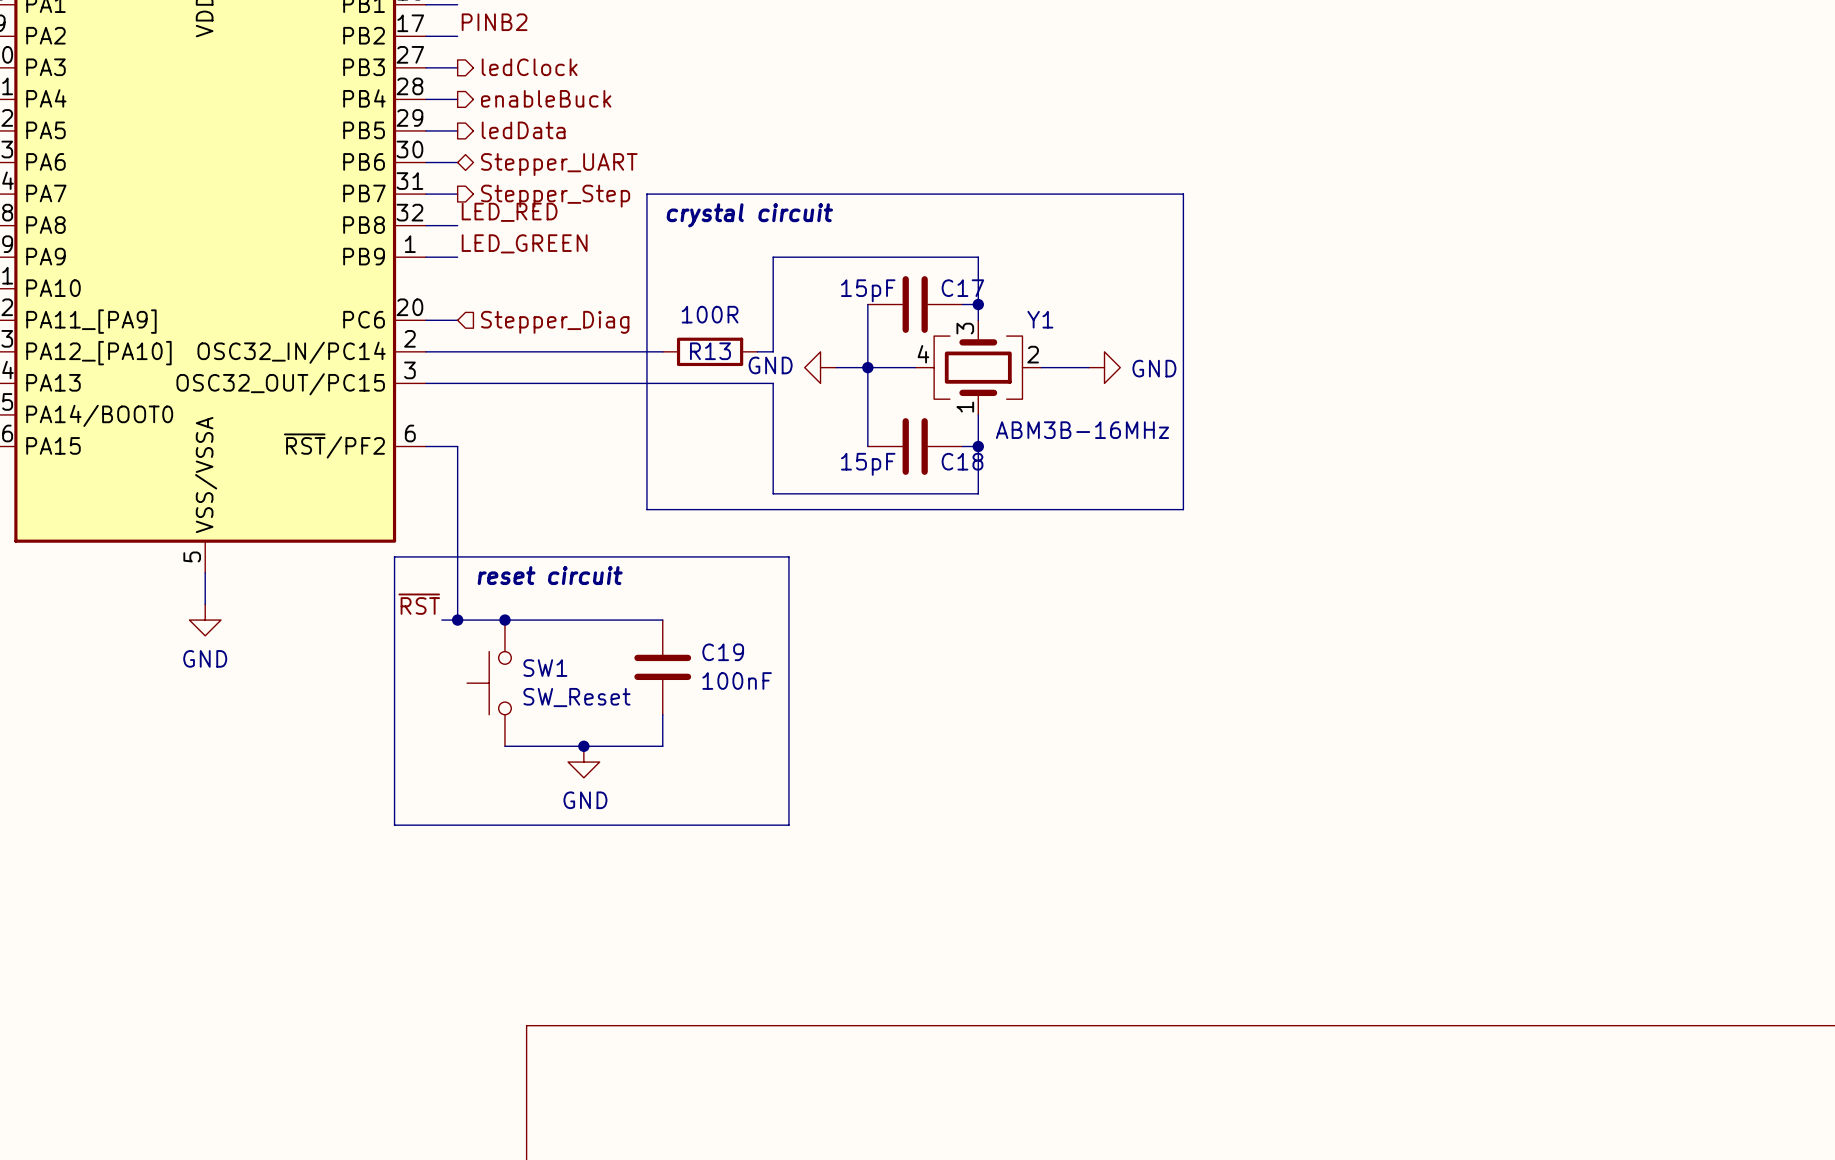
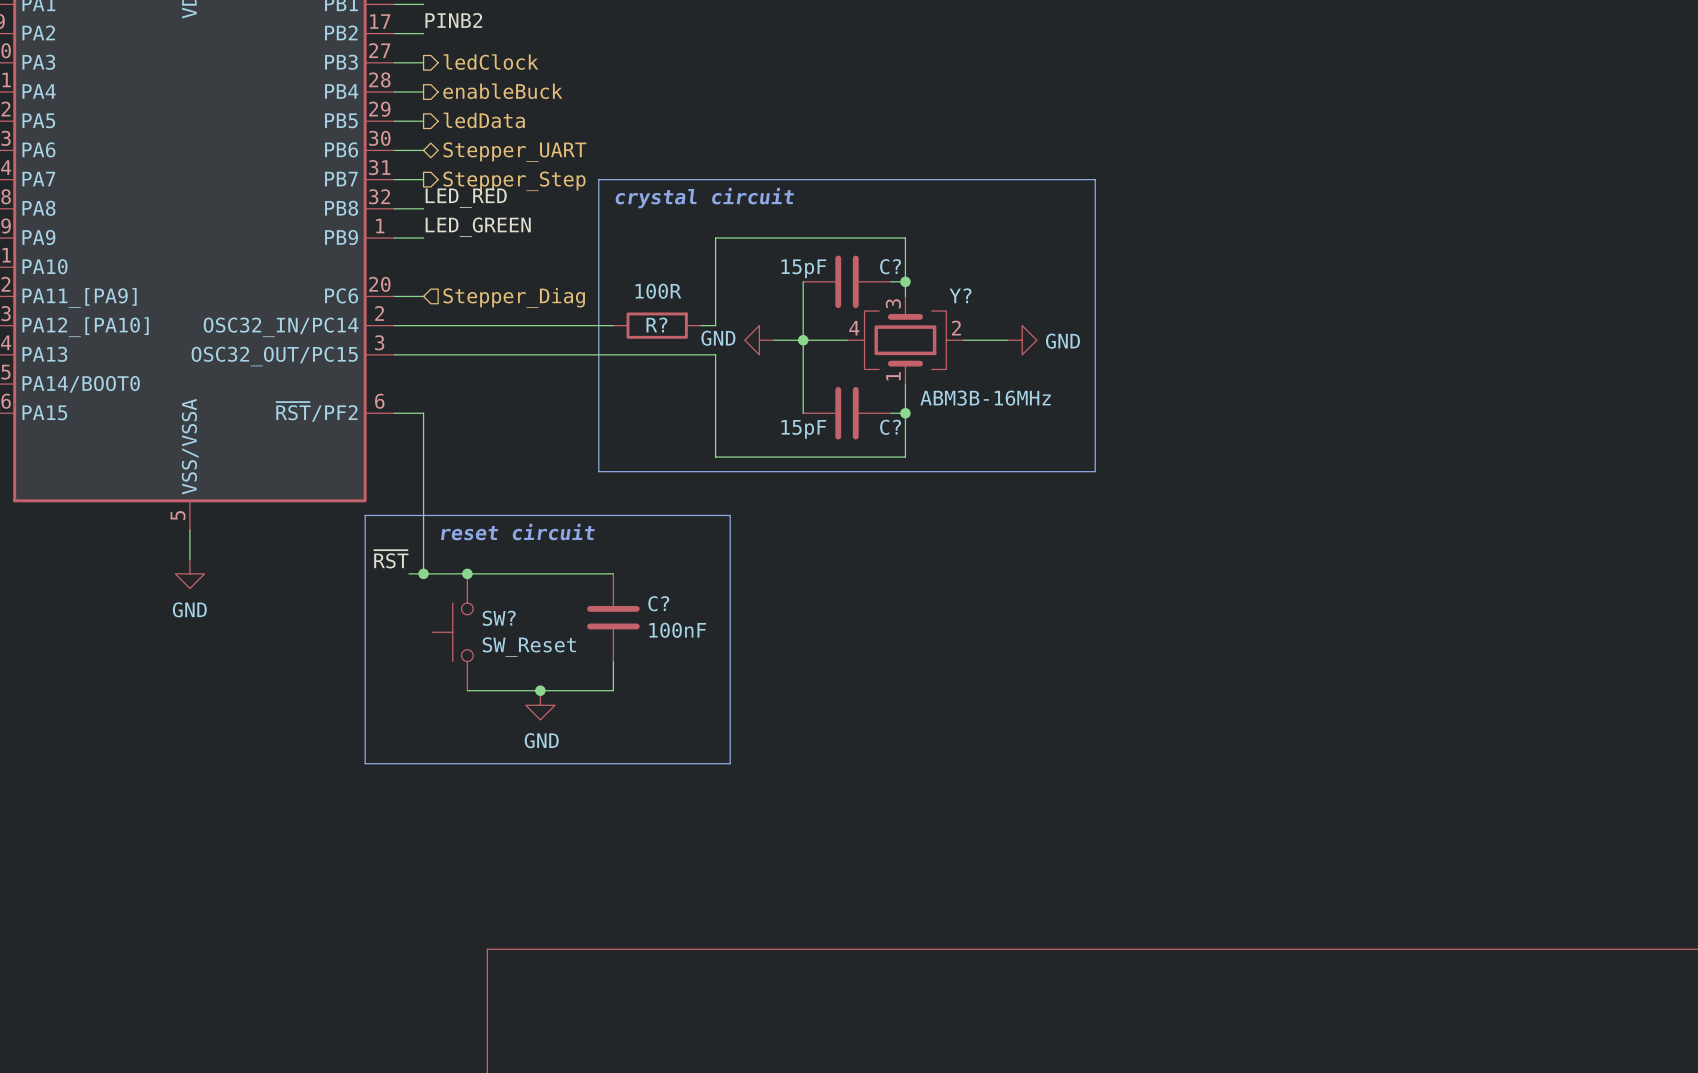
C17 name: C17 (962, 288) -> C? (890, 266)
Y1 name: Y1 (1040, 319) -> Y? (960, 295)
R13 name: R13 (710, 351) -> R? (656, 324)
C18 name: C18 (962, 461) -> C? (890, 427)
C19 name: C19 (723, 652) -> C? (658, 603)
SW1 name: SW1 (545, 668) -> SW? (499, 618)

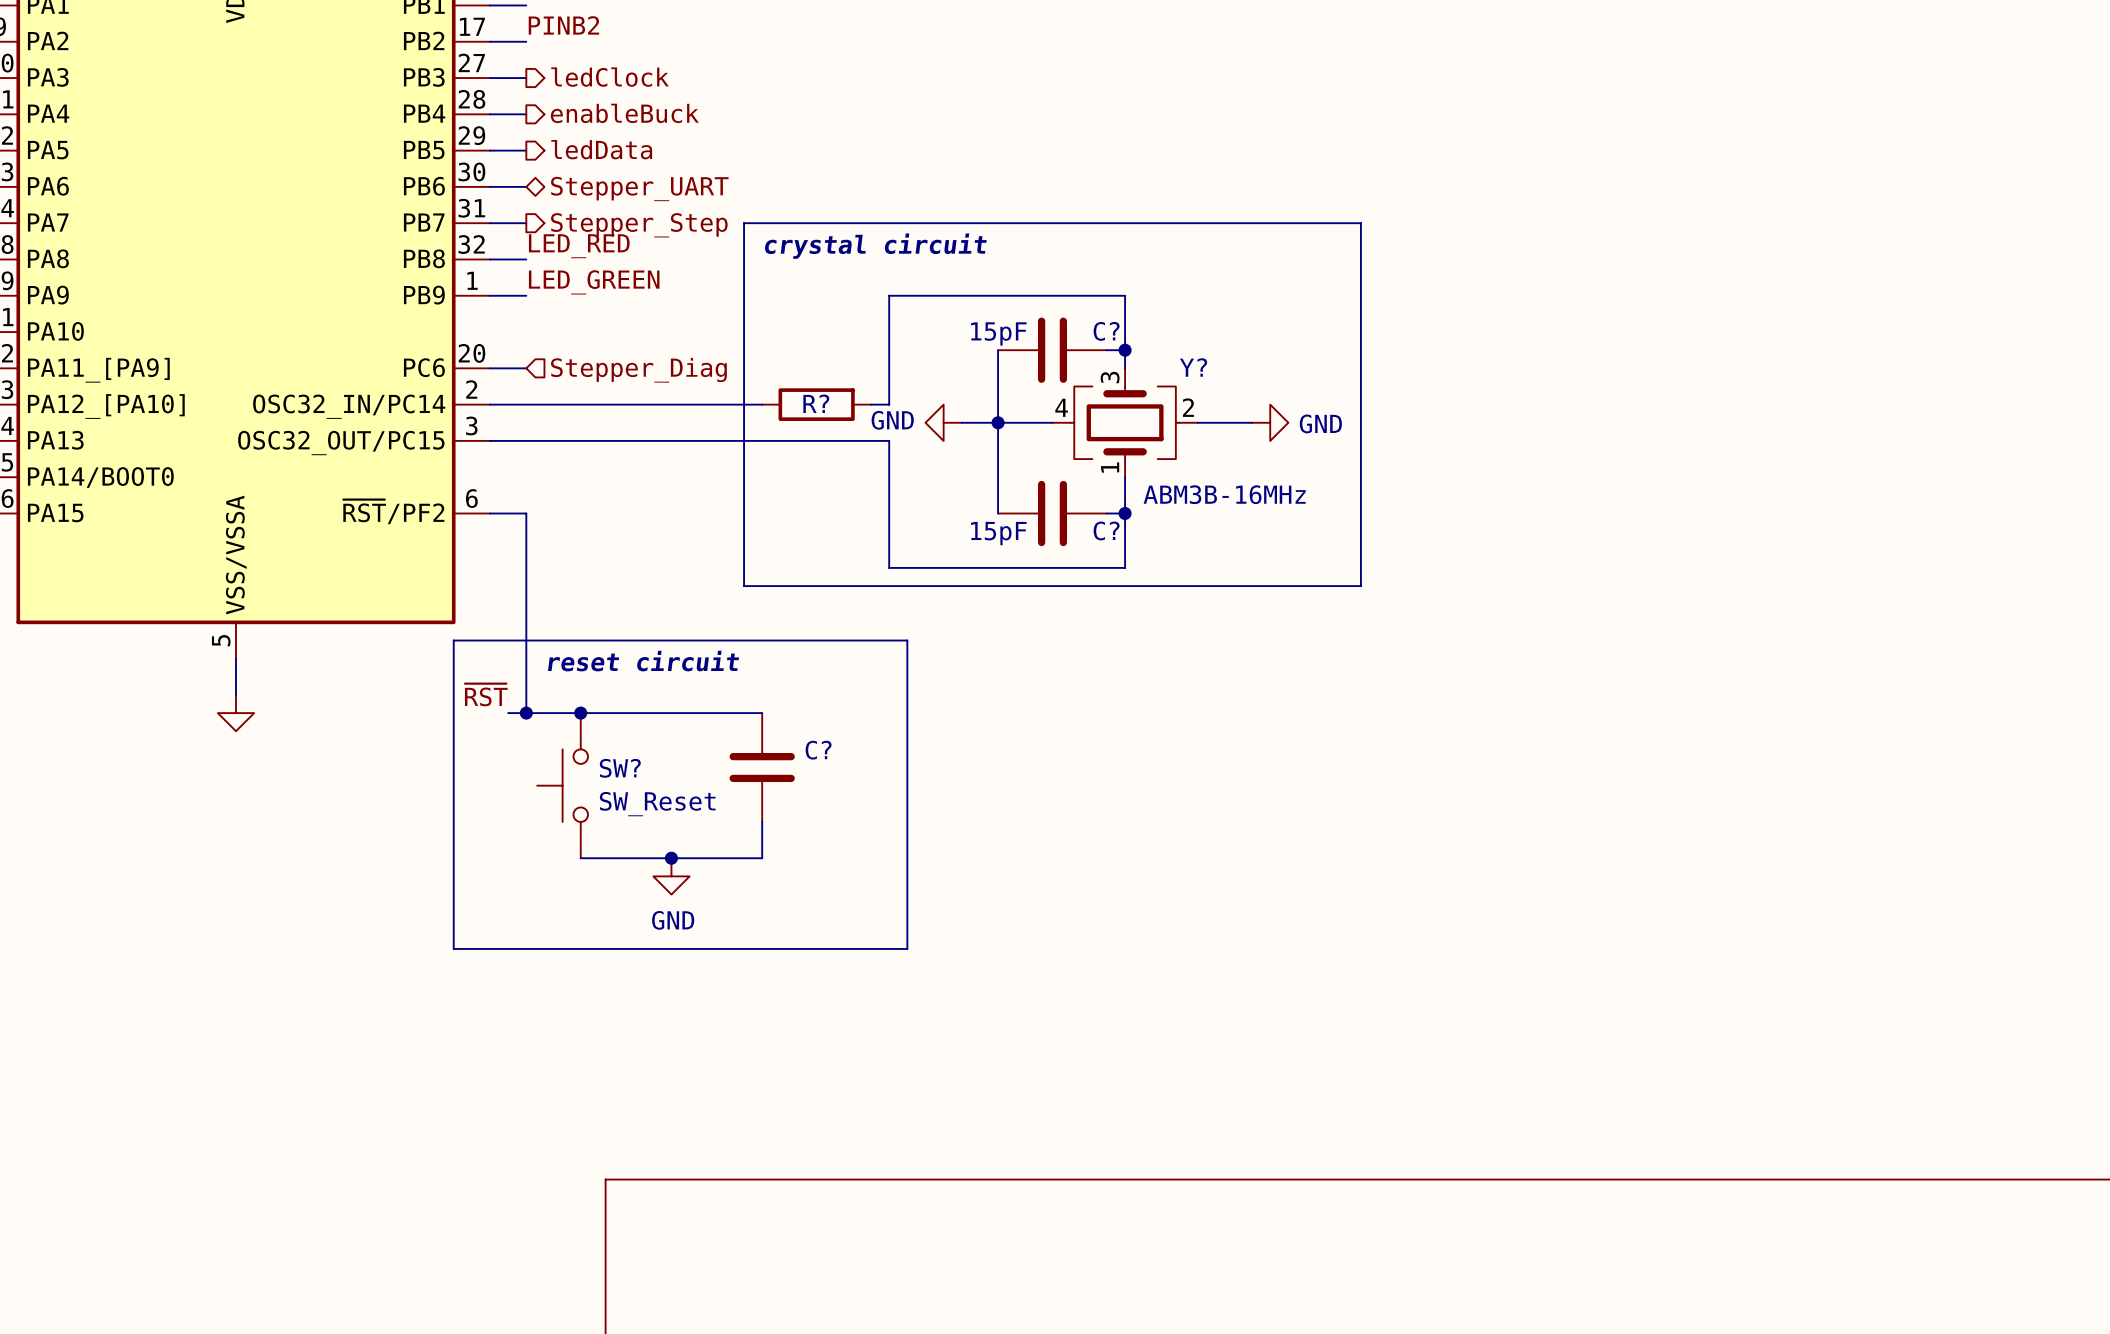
R? value: 100R (658, 291) -> none
power symbol text: GND (189, 609) -> none
C? value: 100nF (677, 630) -> none

